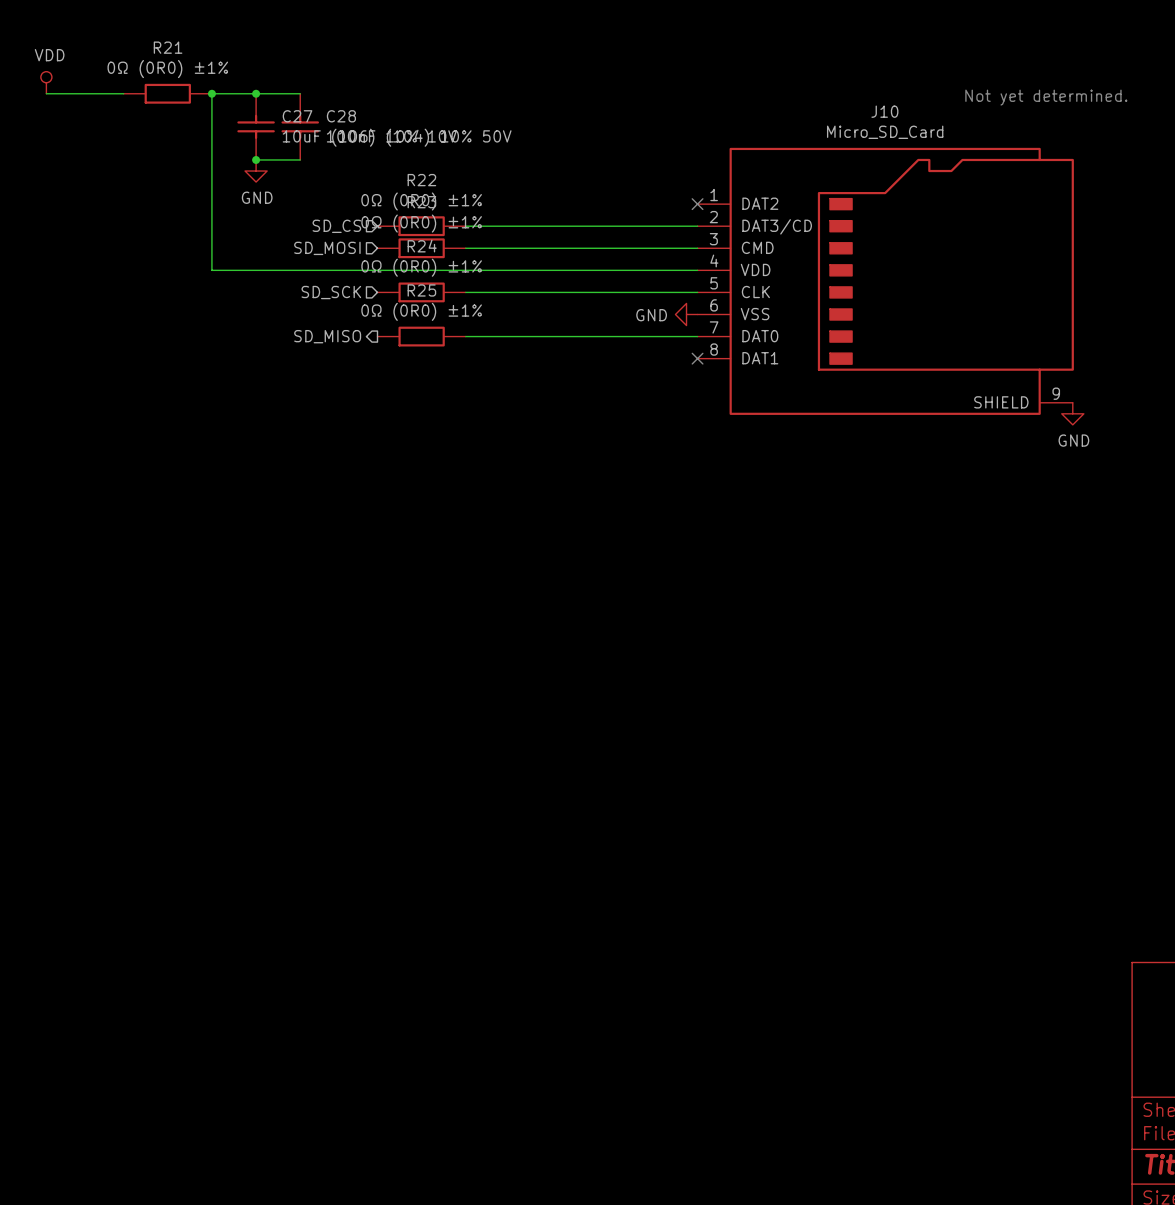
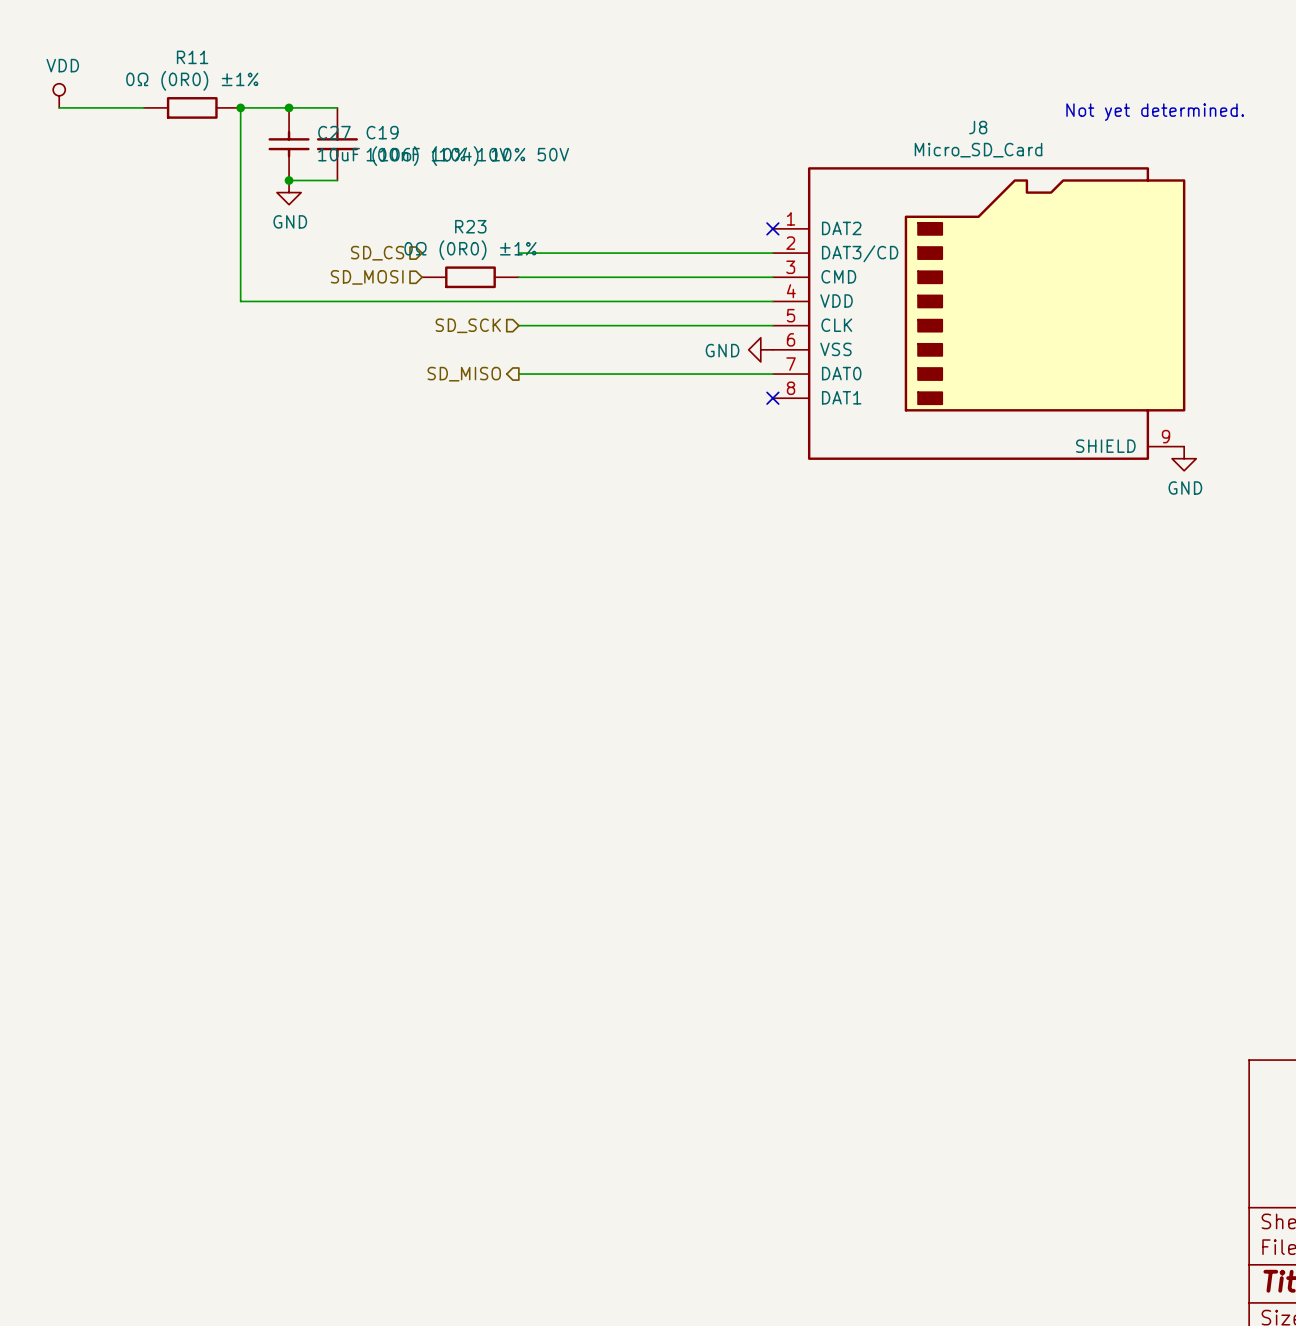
R21 name: R21 (168, 47) -> R11 (192, 57)
J10 name: J10 (884, 111) -> J8 (978, 127)
C28 name: C28 (341, 116) -> C19 (382, 132)
R22: (421, 226) -> none
hierarchical label position: SD_SCK (331, 292) -> SD_SCK (468, 325)
R24: (421, 292) -> none
hierarchical label position: SD_MISO (327, 336) -> SD_MISO (464, 374)
R25: (421, 336) -> none

